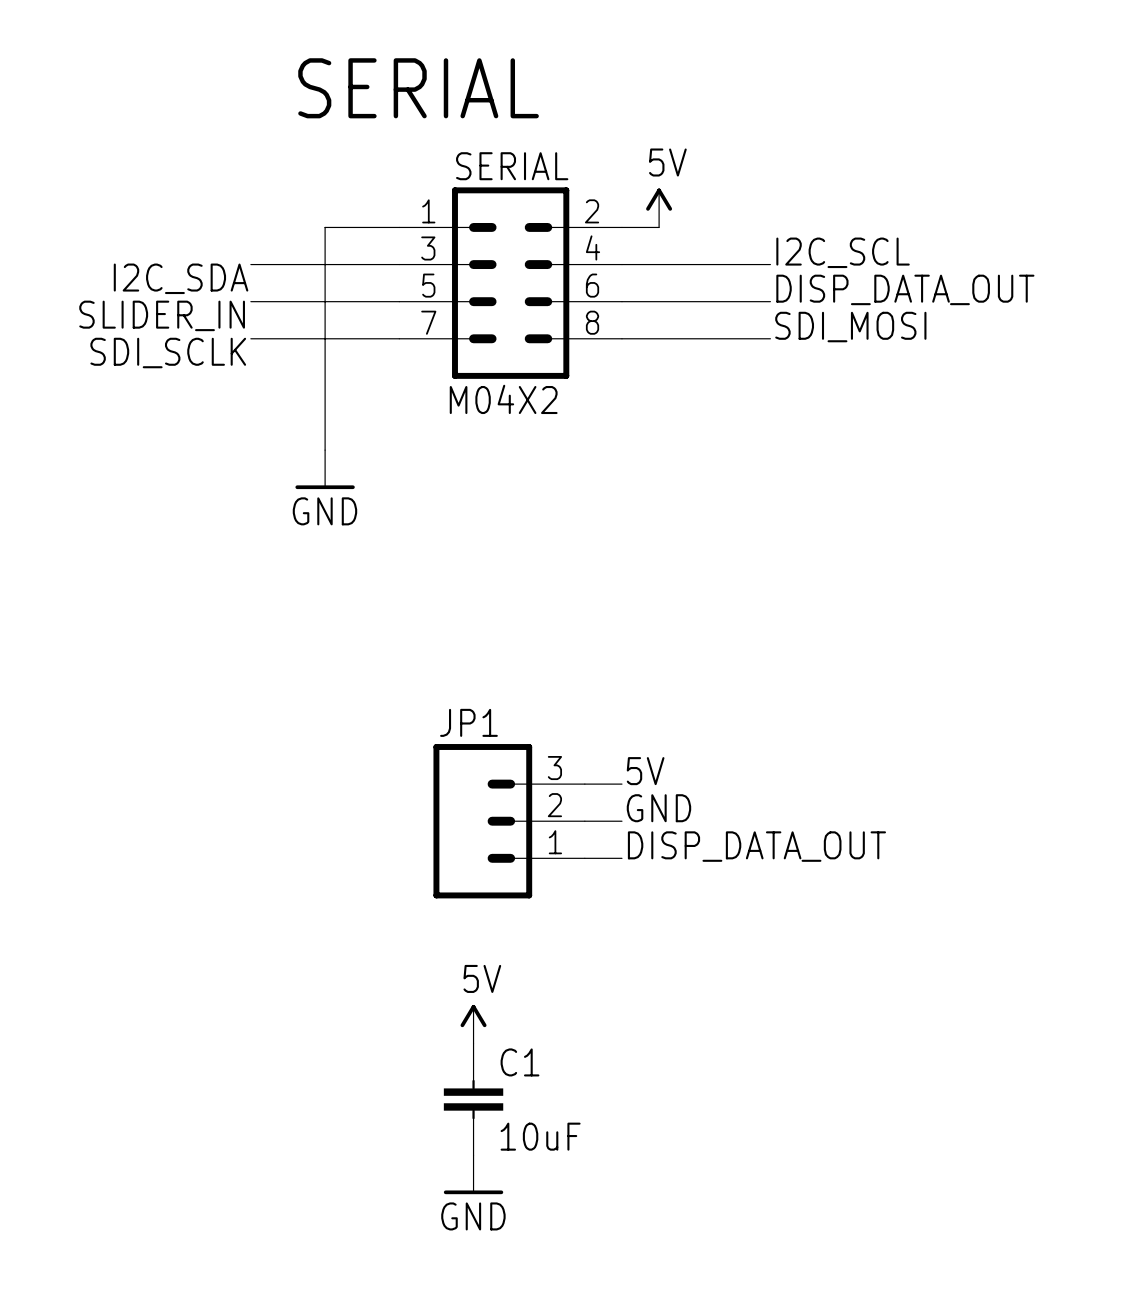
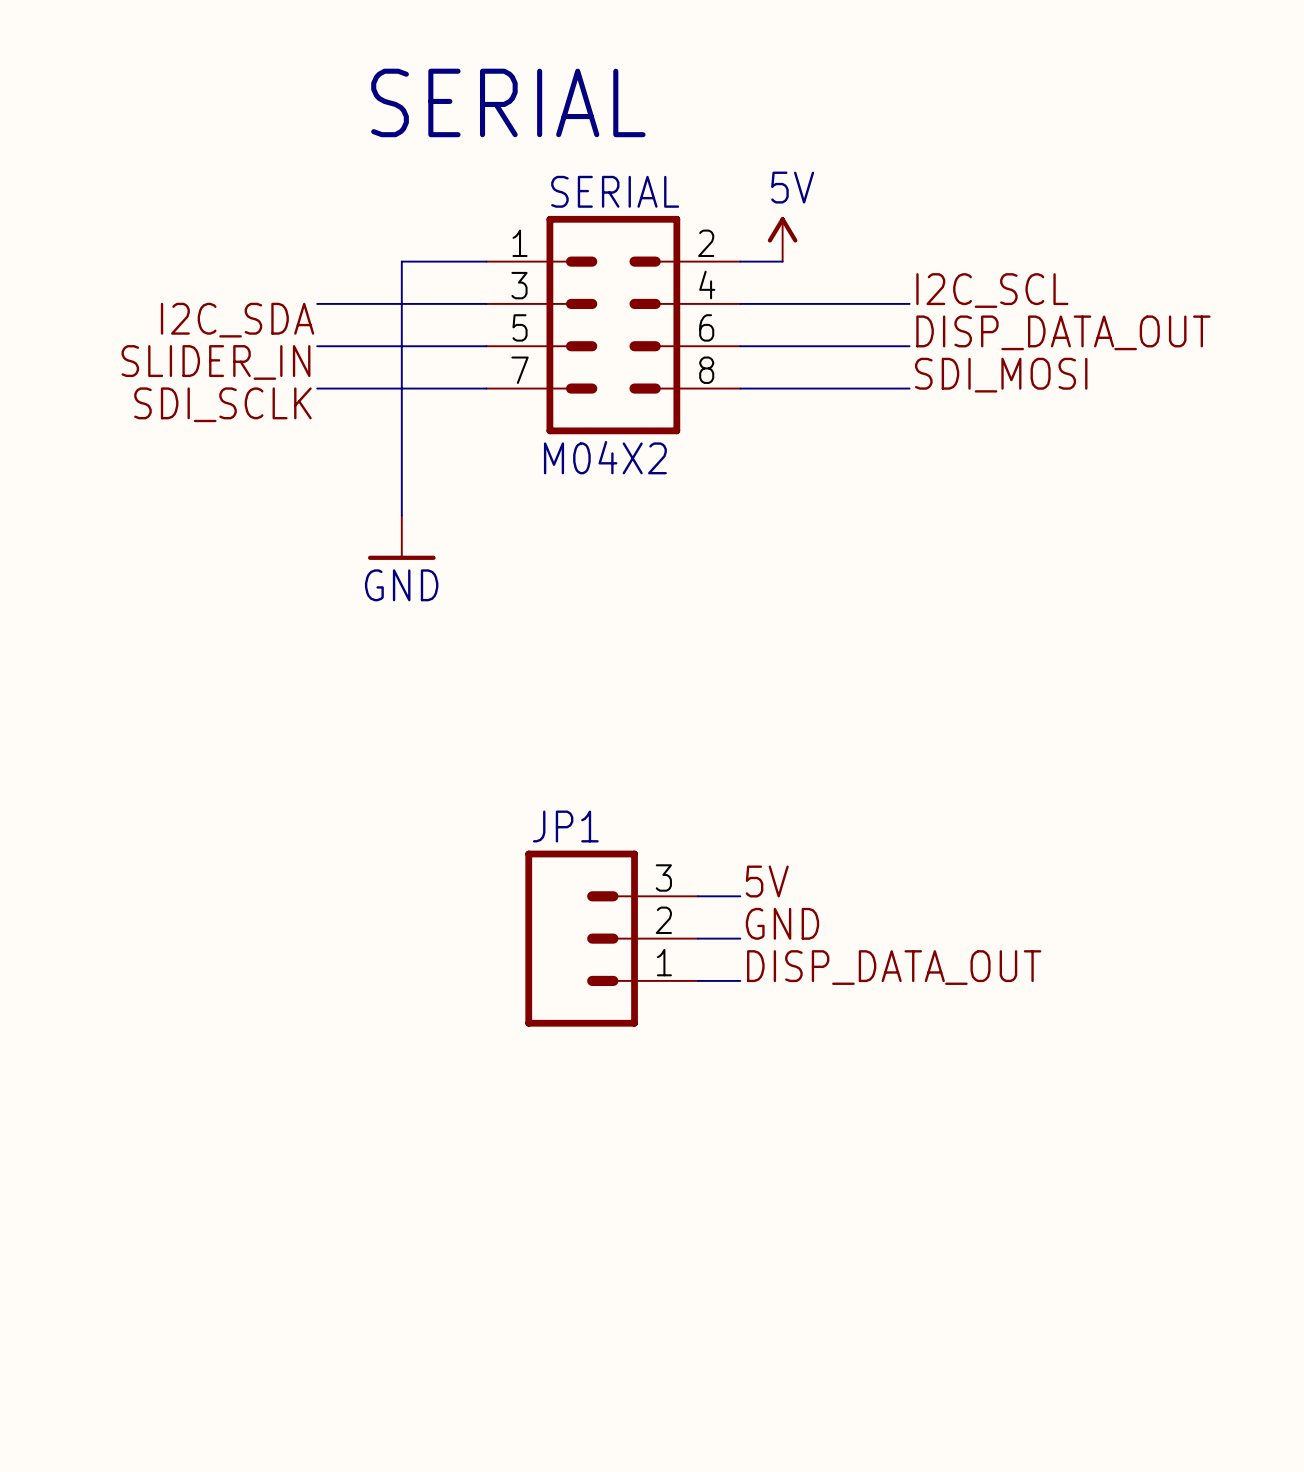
power symbol: 5V (473, 1024) -> none
C1: 10uF (473, 1099) -> none
power symbol: GND (473, 1174) -> none

